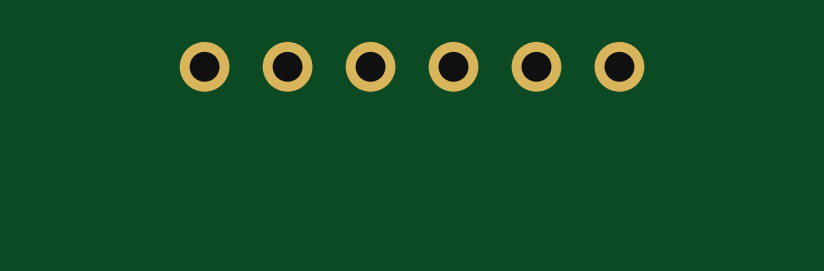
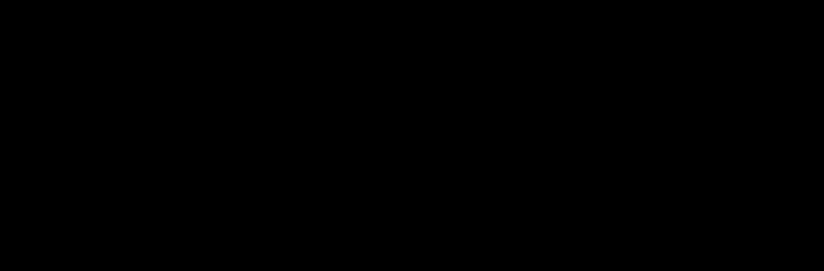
part: (412, 66) -> none

